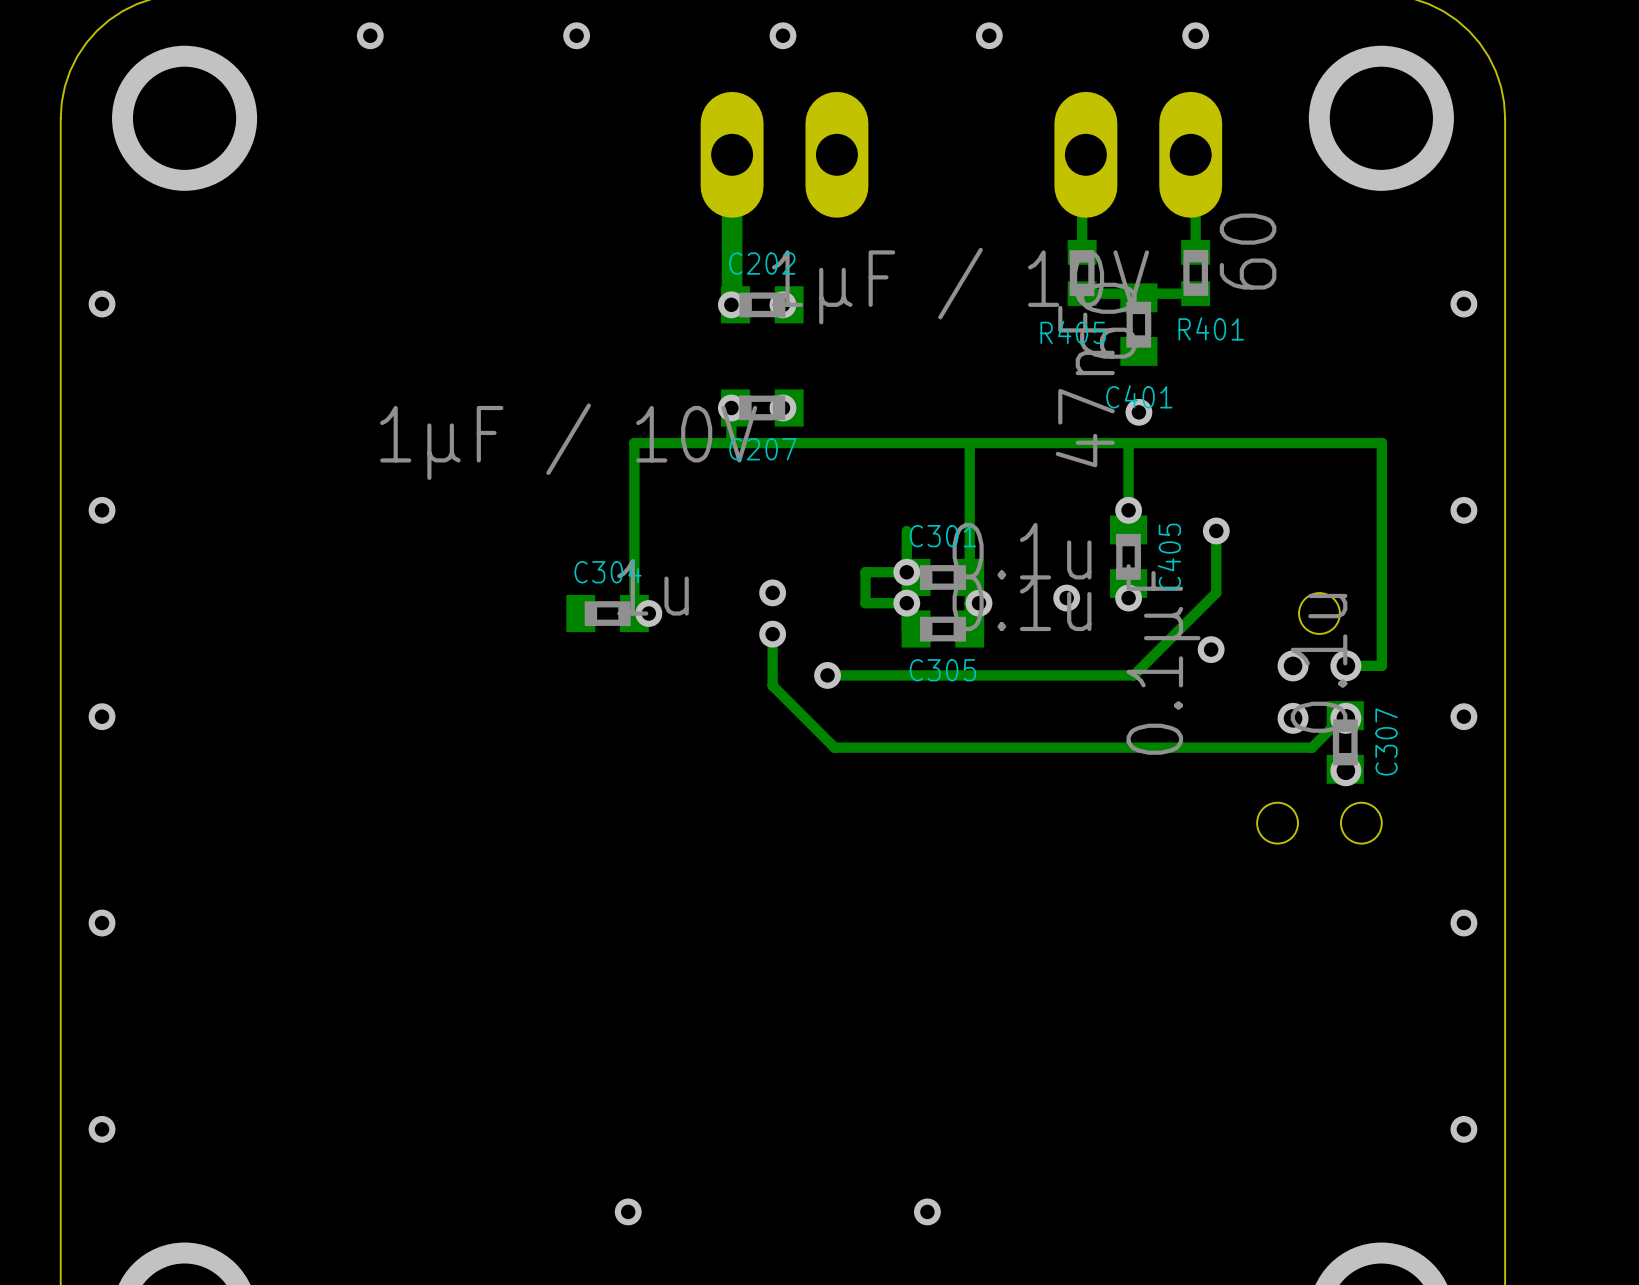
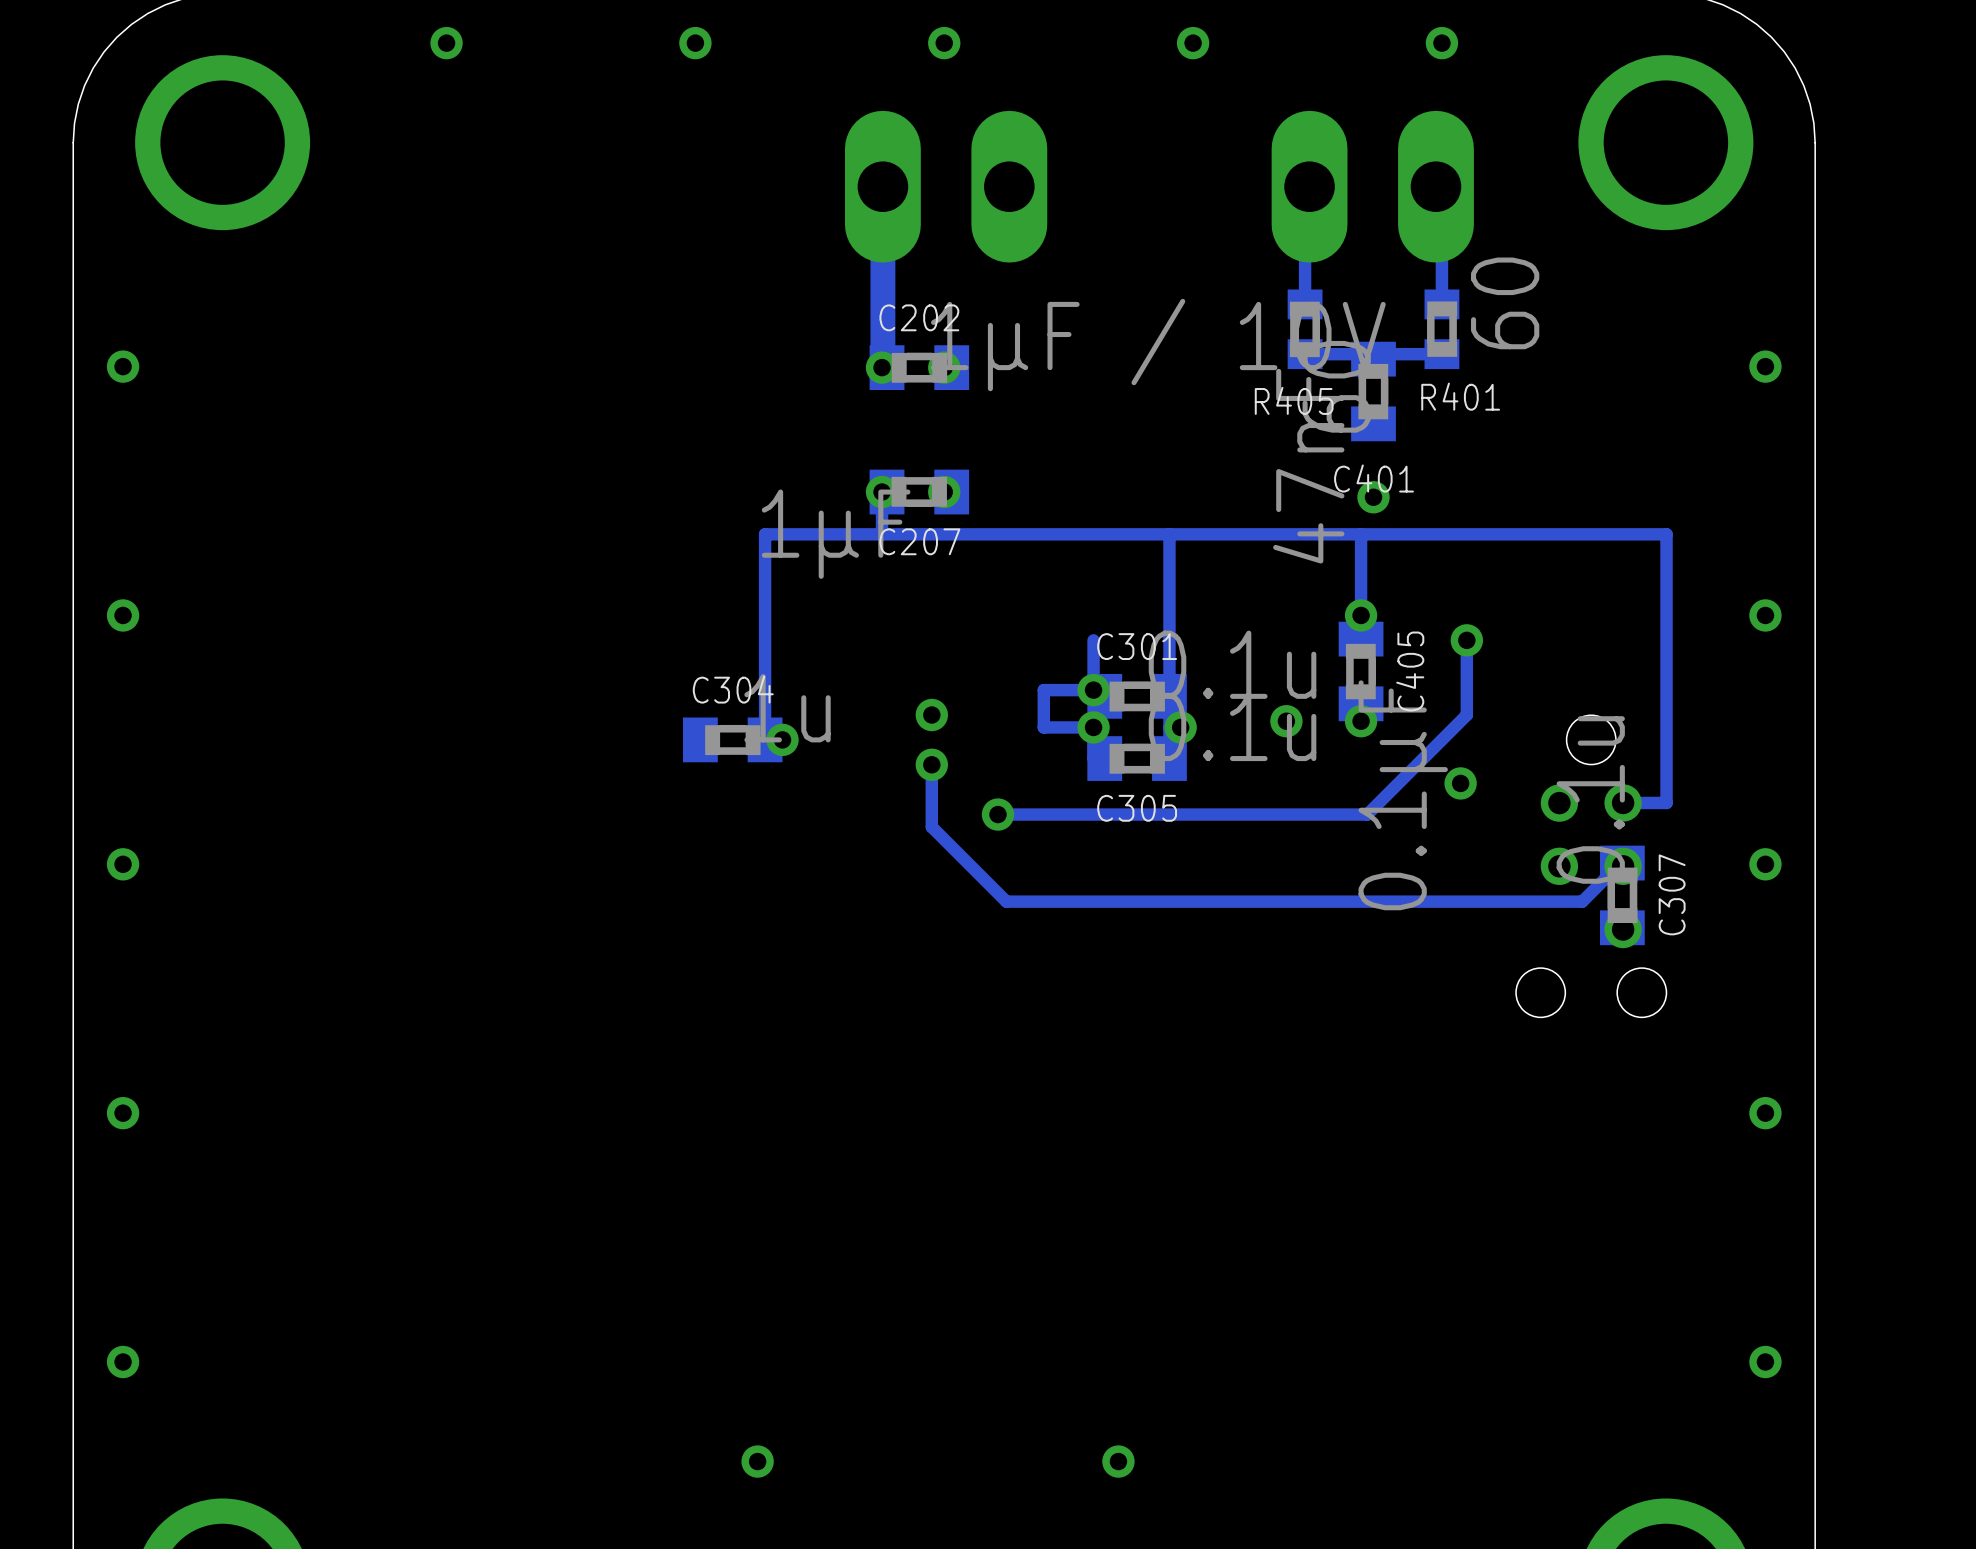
C207 value: 1μF / 10V (568, 441) -> 1μF (836, 534)

